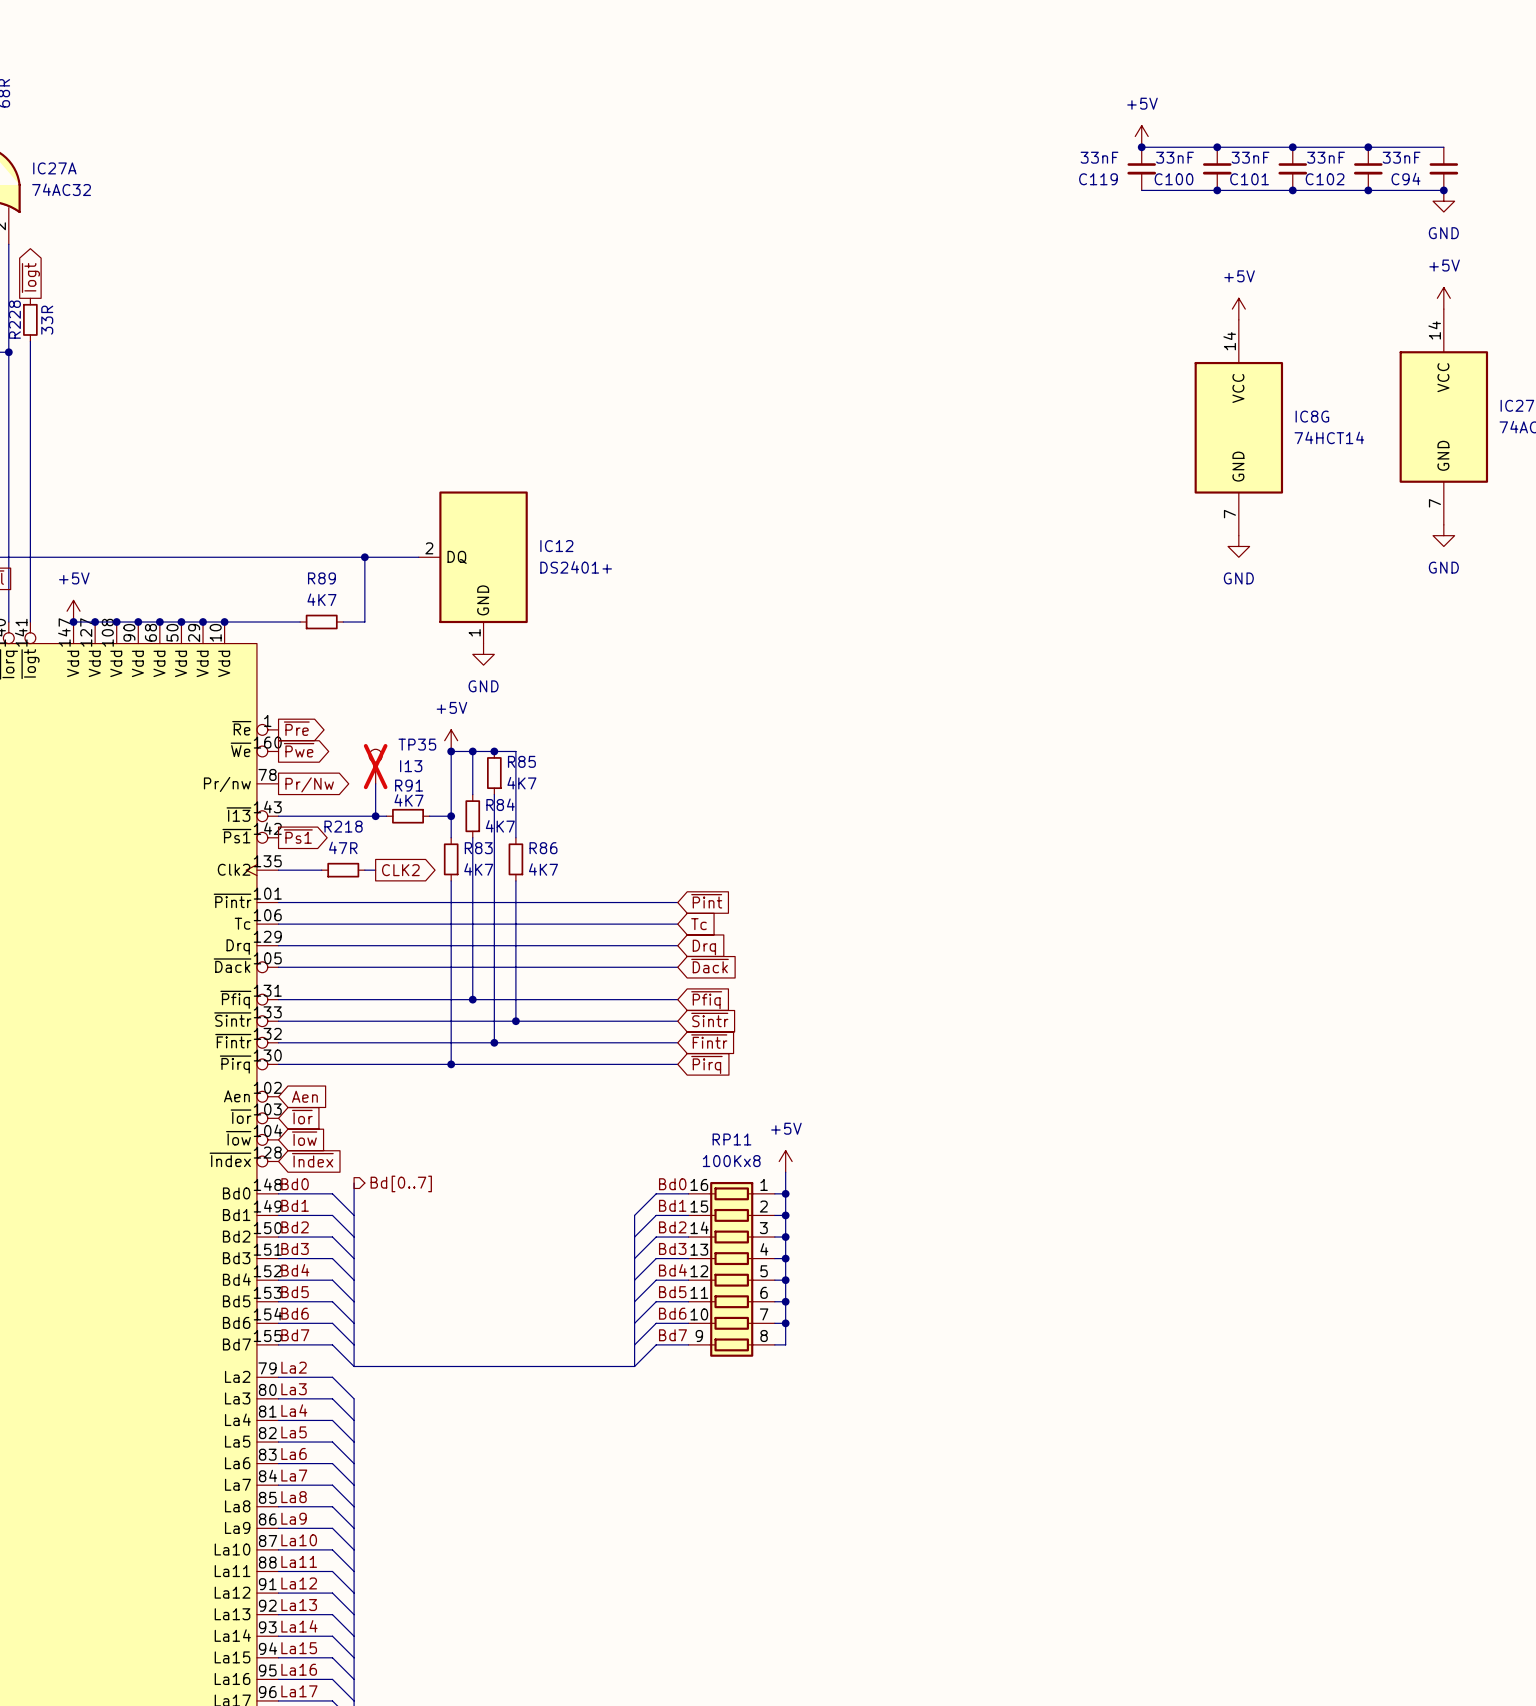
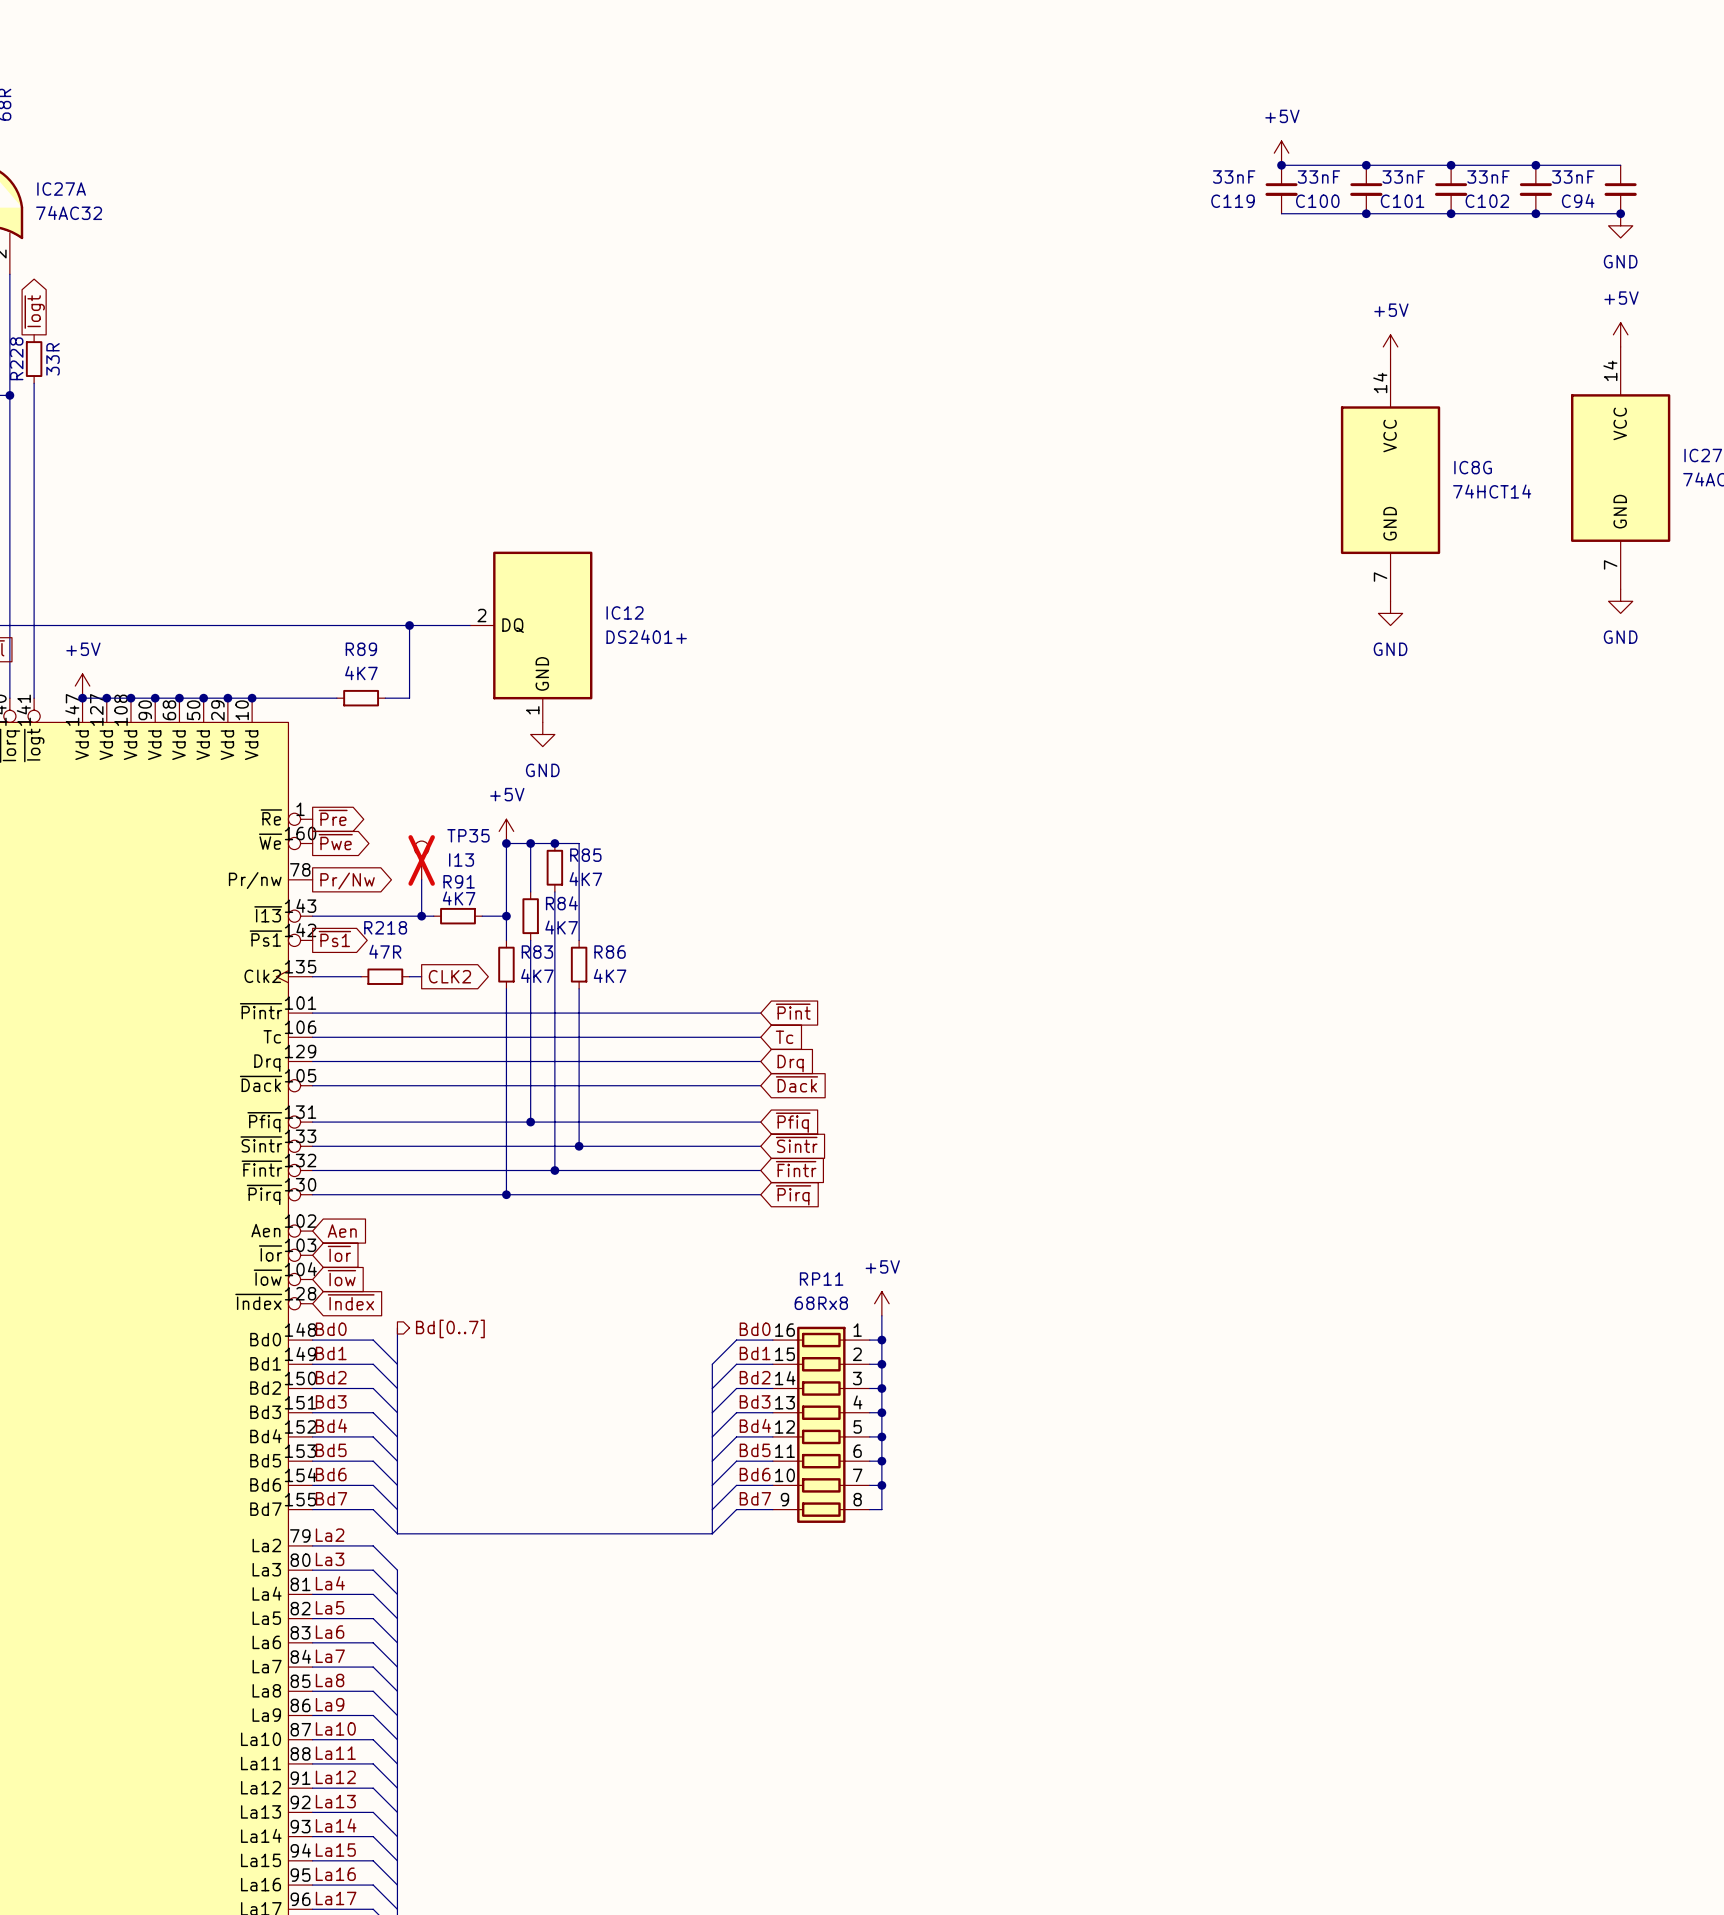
RP11 value: 100Kx8 (731, 1161) -> 68Rx8 (821, 1303)

